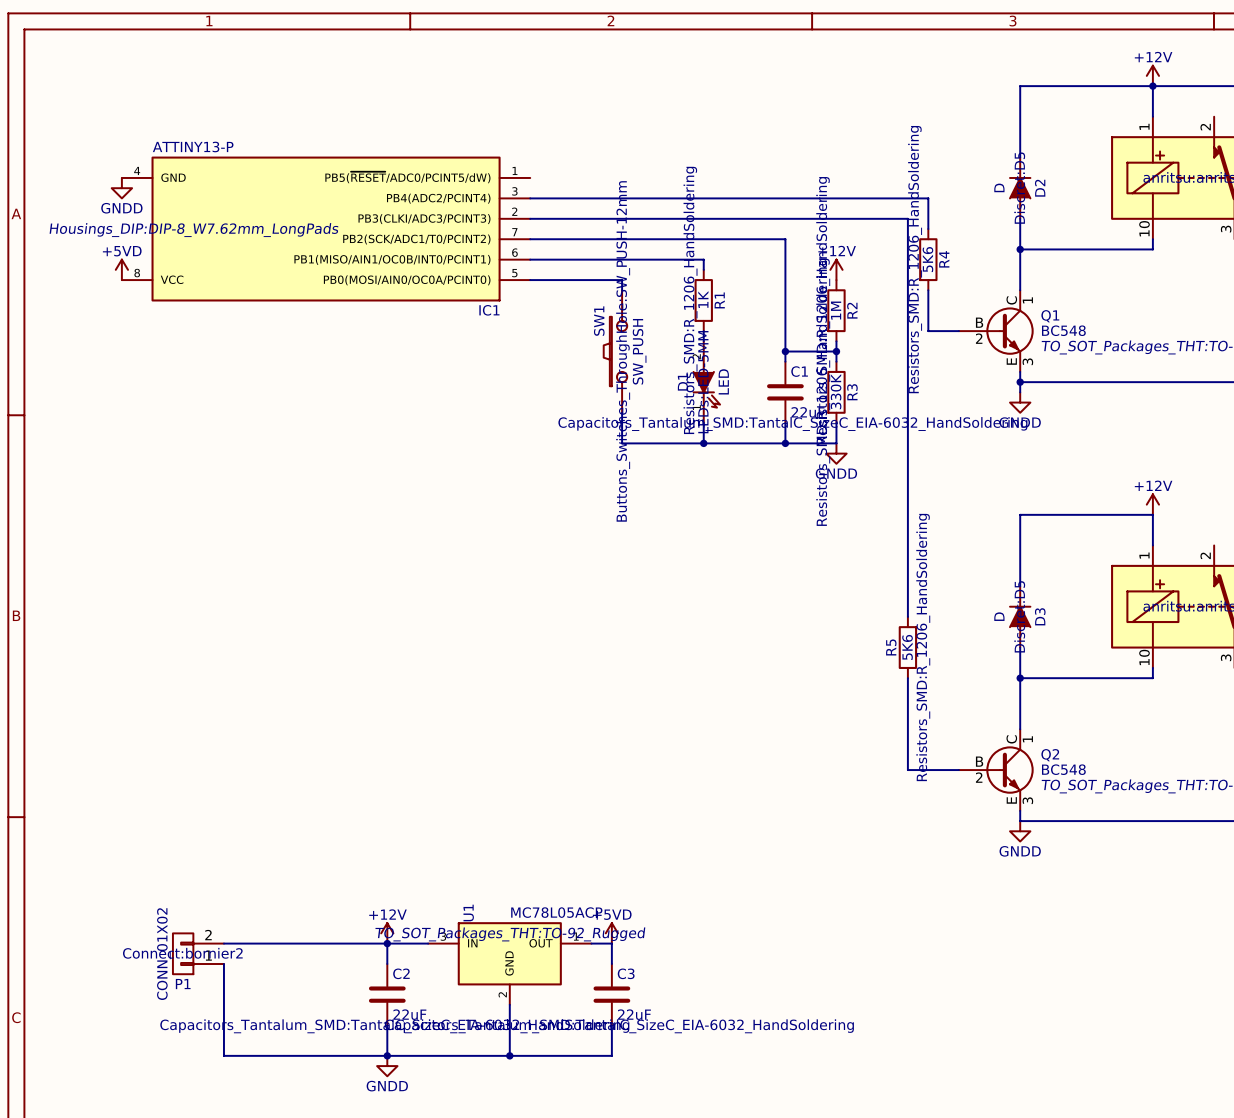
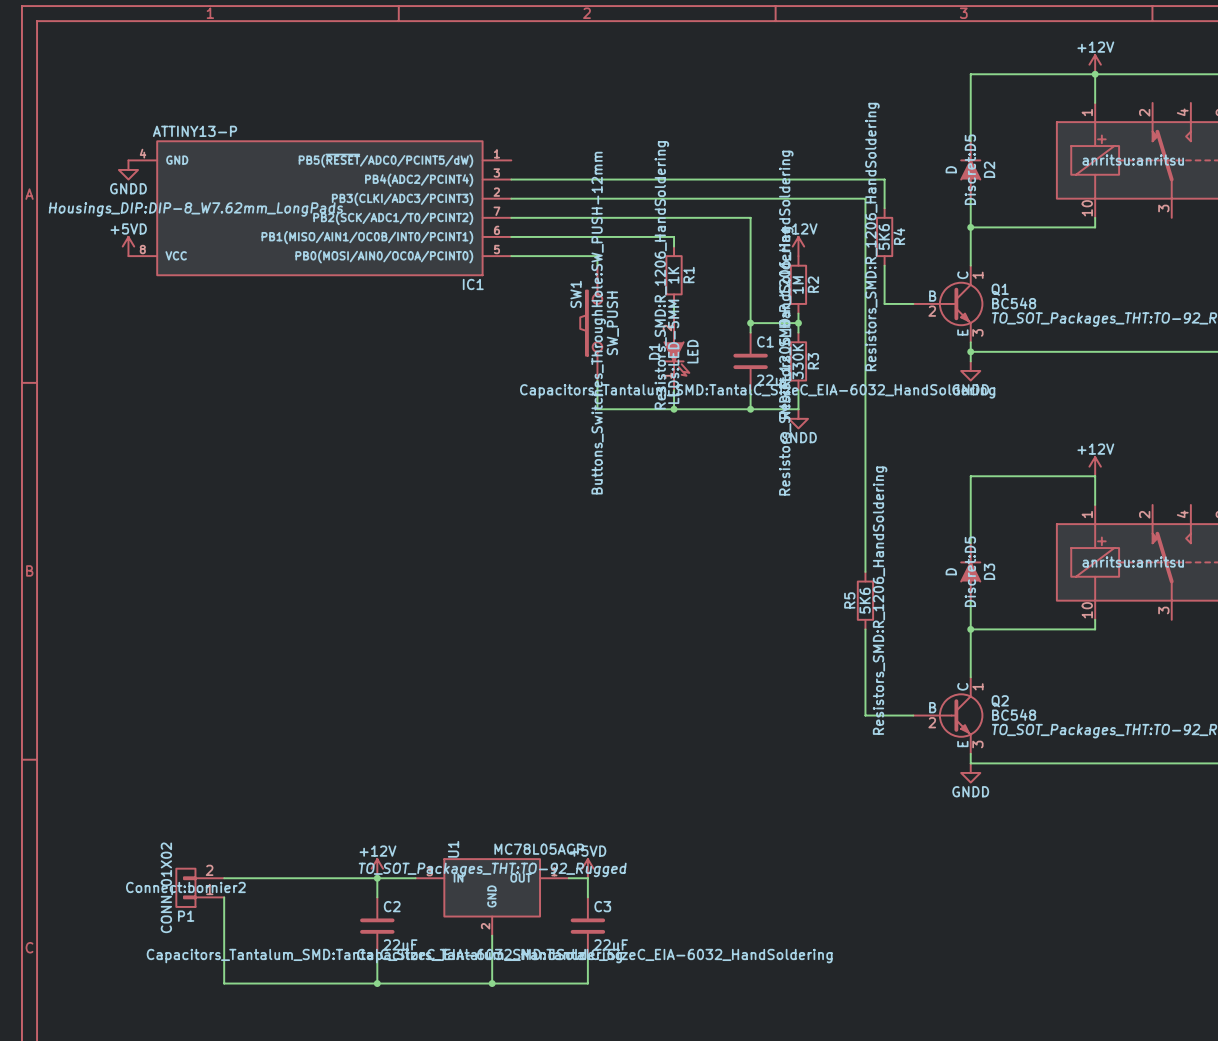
power symbol: GNDD (387, 1066) -> none

